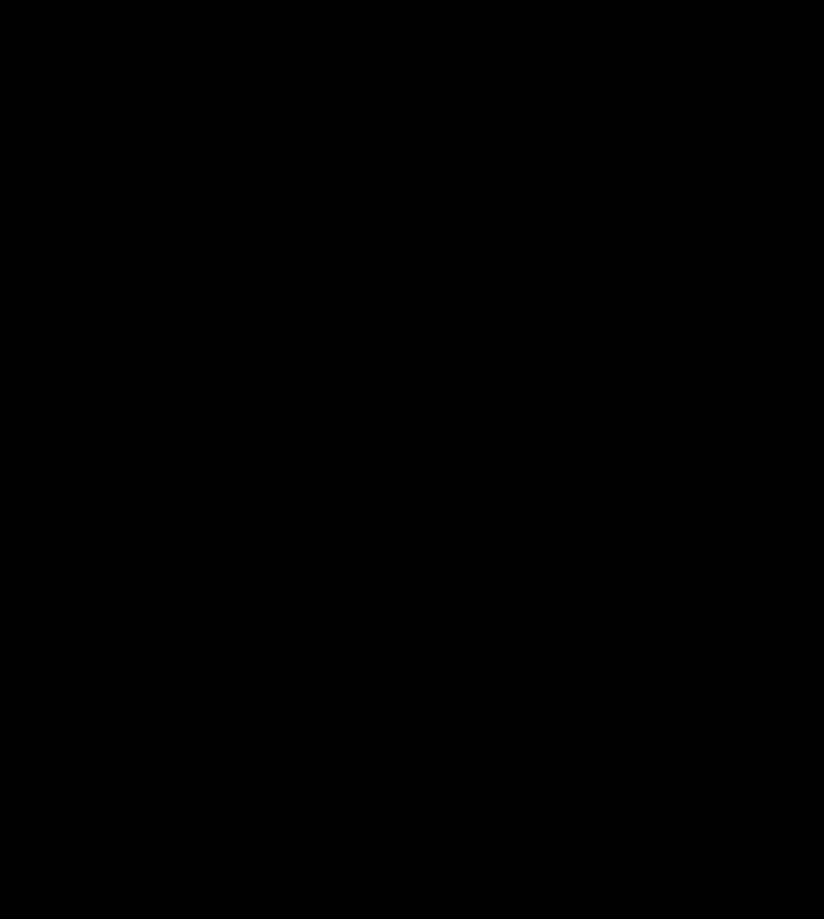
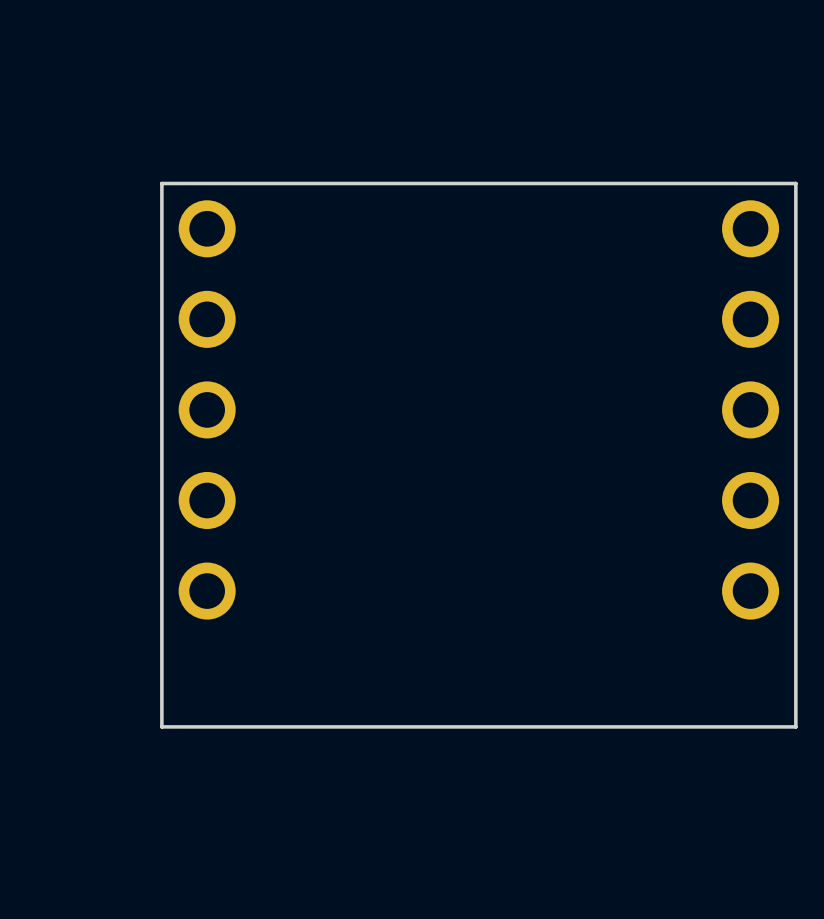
board edge: none -> (795, 183) (161, 183) (161, 726) (795, 726) (795, 183)
part: none -> (207, 228)
part: none -> (750, 228)
part: none -> (207, 319)
part: none -> (750, 319)
part: none -> (207, 409)
part: none -> (750, 409)
part: none -> (207, 500)
part: none -> (750, 500)
part: none -> (207, 591)
part: none -> (750, 591)

